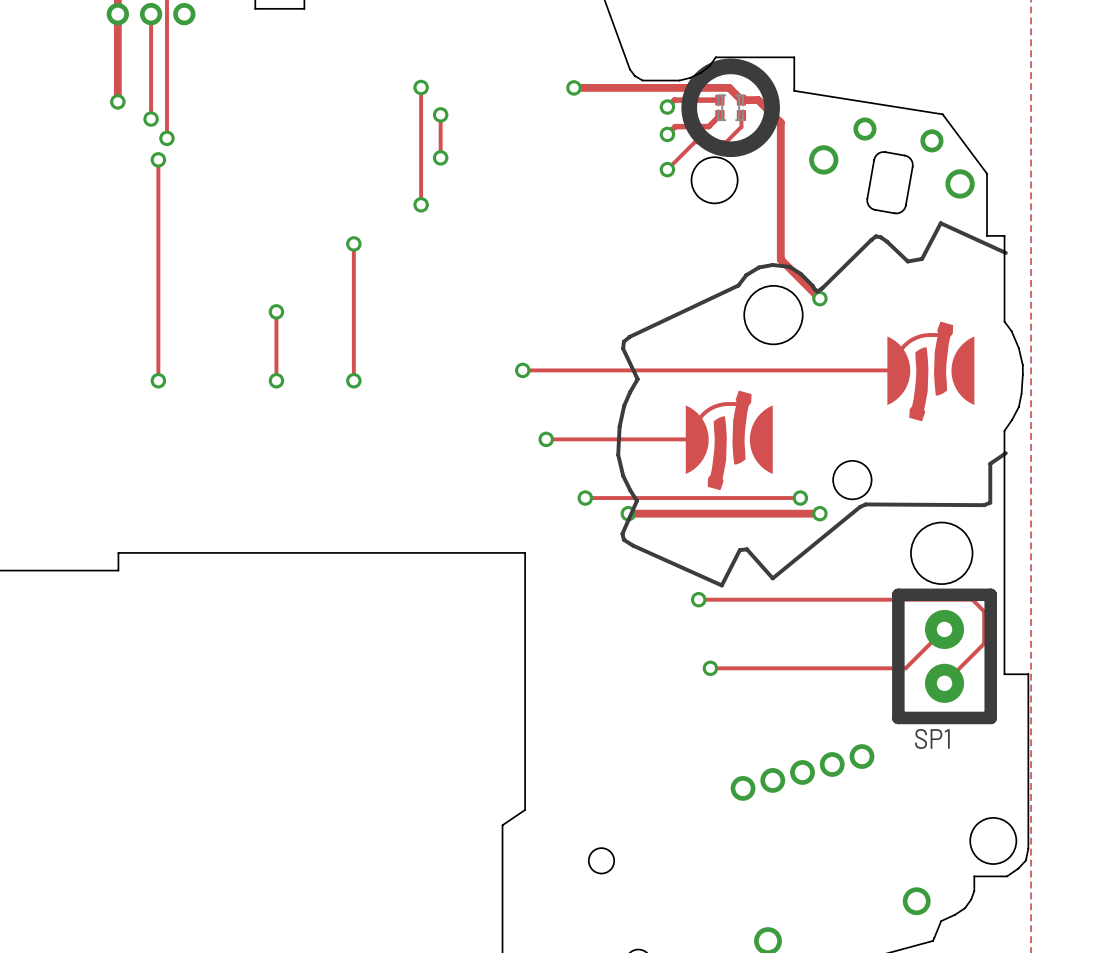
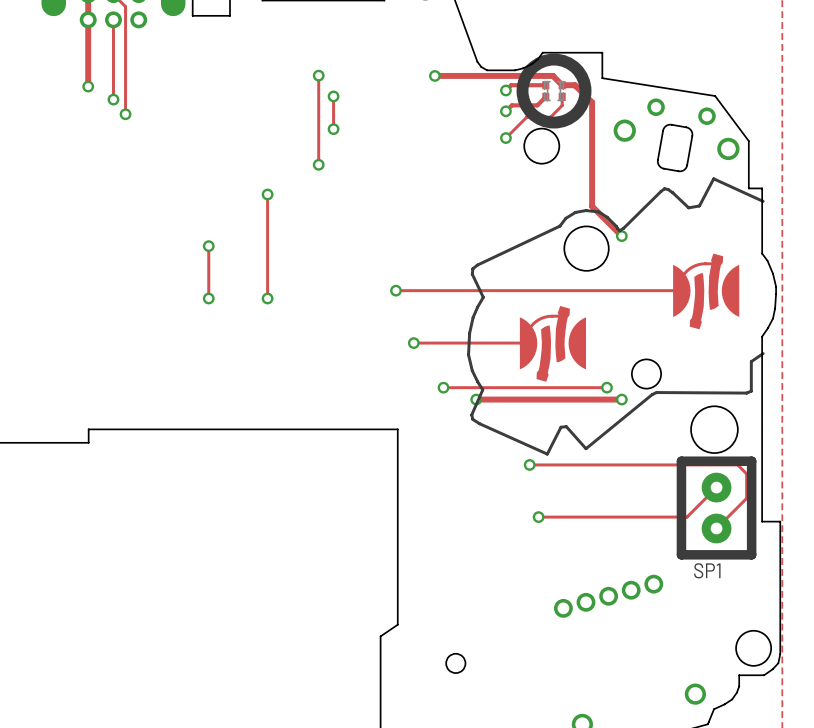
track: (158, 159) (158, 380) -> none
via: (158, 159) -> none
via: (158, 380) -> none

